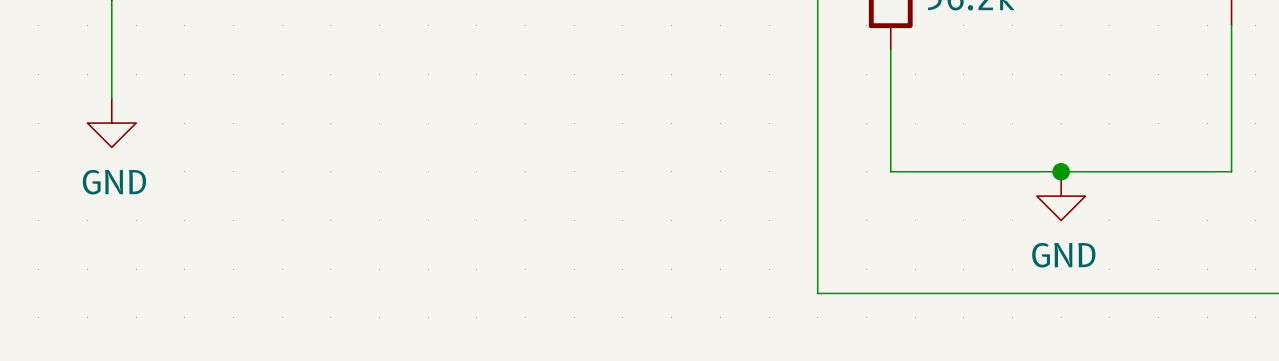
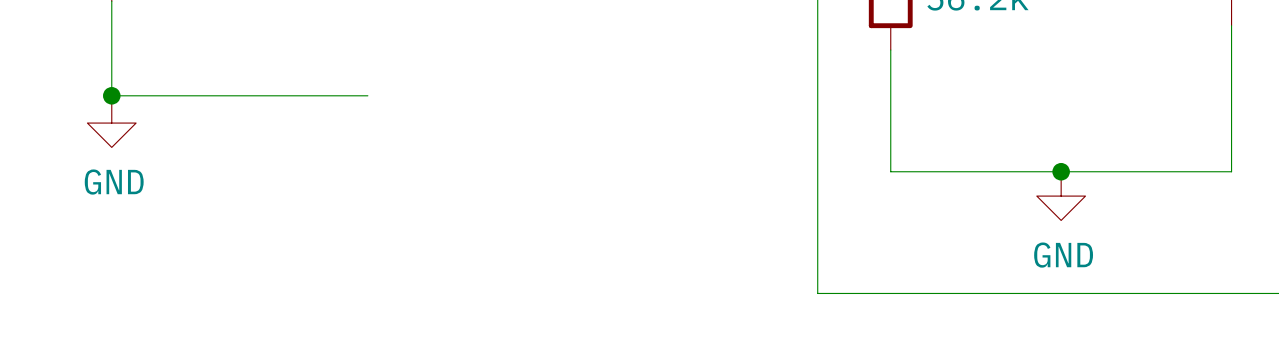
wire: none -> (111, 95) (367, 95)
junction: none -> (111, 95)

